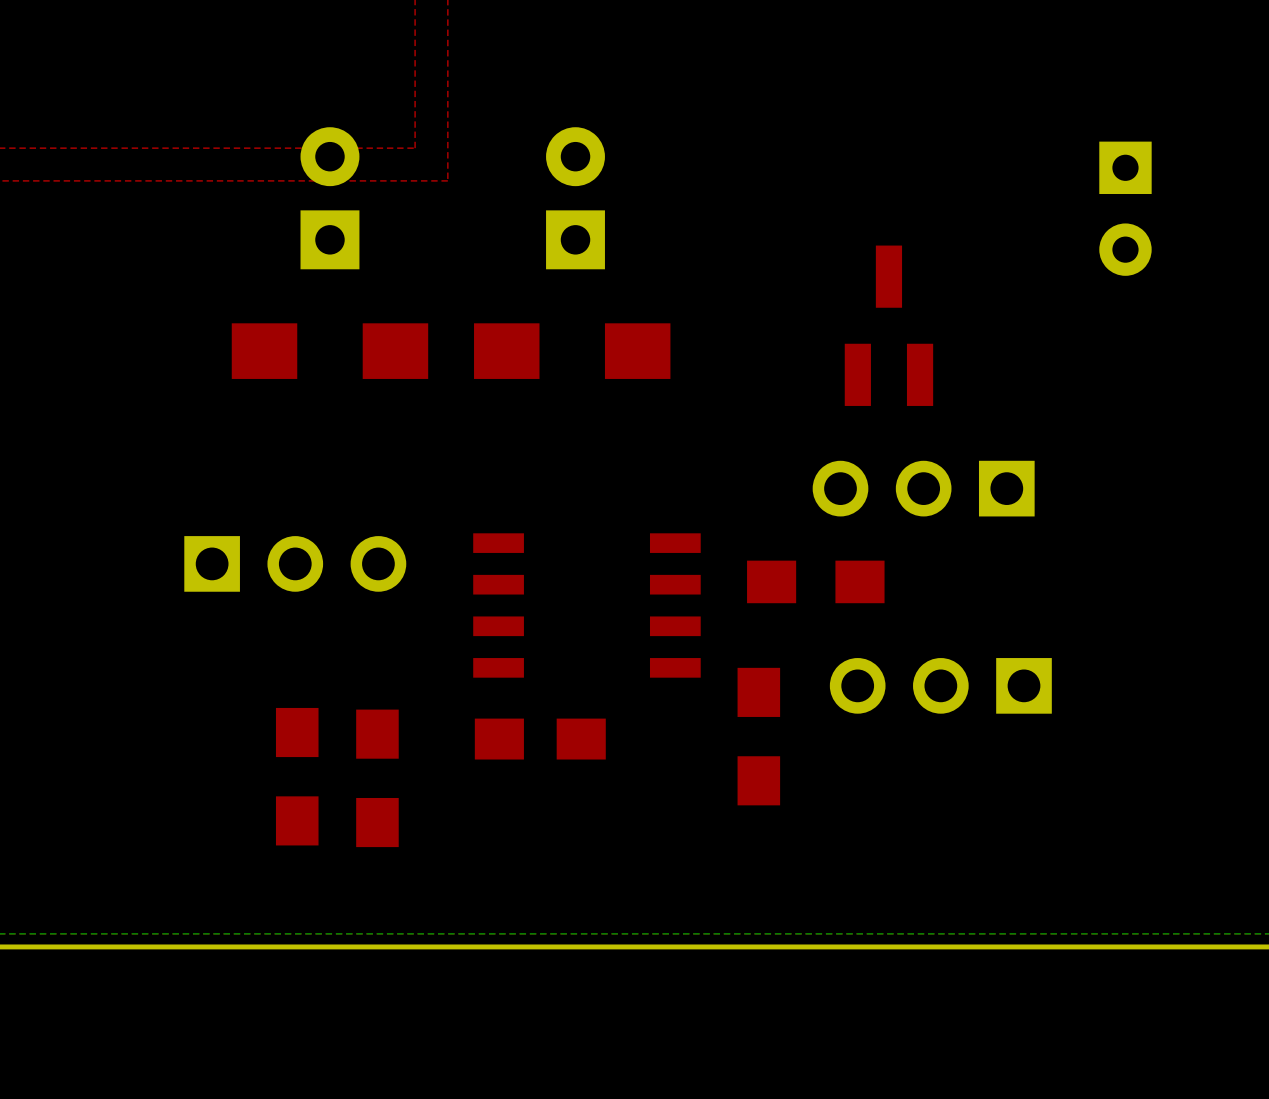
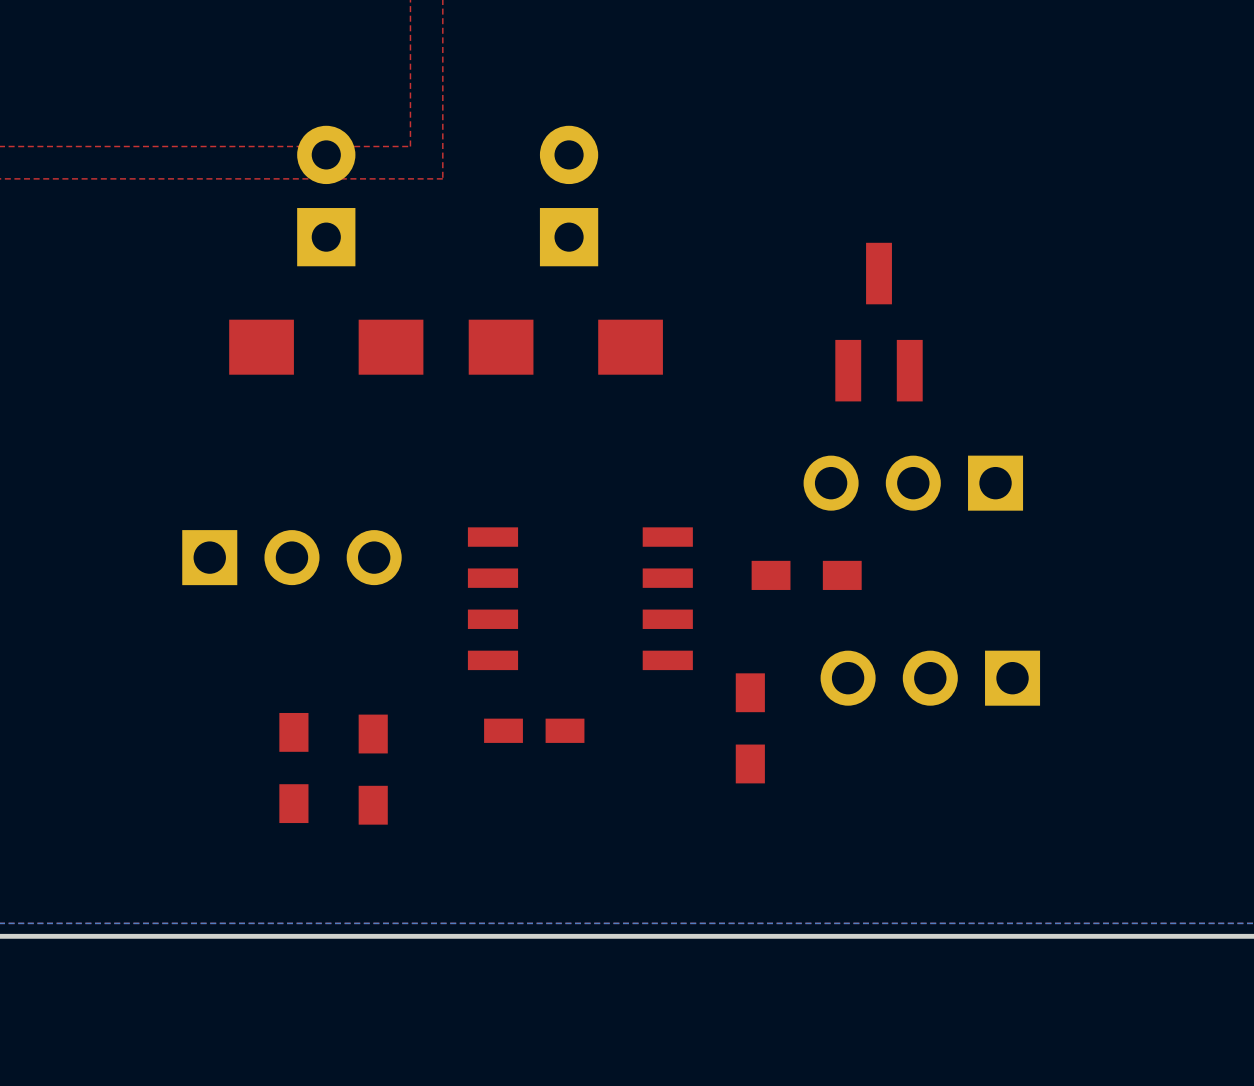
part: (1125, 208) -> none
part footprint: [747, 560, 885, 604] -> [751, 560, 862, 590]
part footprint: [737, 667, 781, 806] -> [735, 673, 765, 784]
part footprint: [275, 707, 319, 846] -> [279, 712, 309, 824]
part footprint: [356, 709, 399, 848] -> [358, 714, 388, 825]
part footprint: [474, 718, 606, 760] -> [484, 718, 585, 743]

